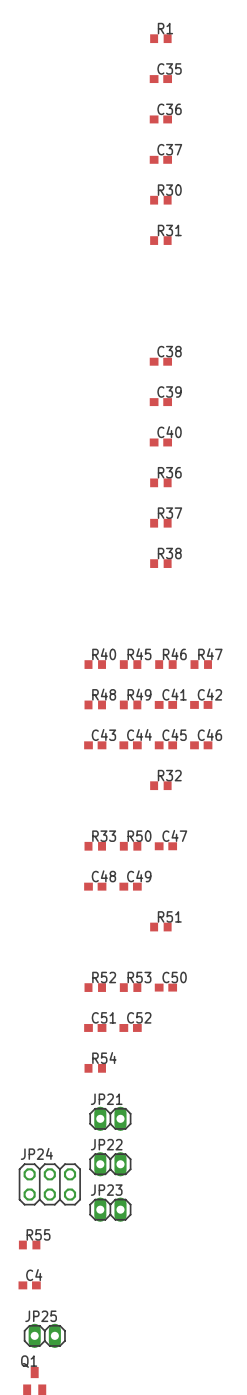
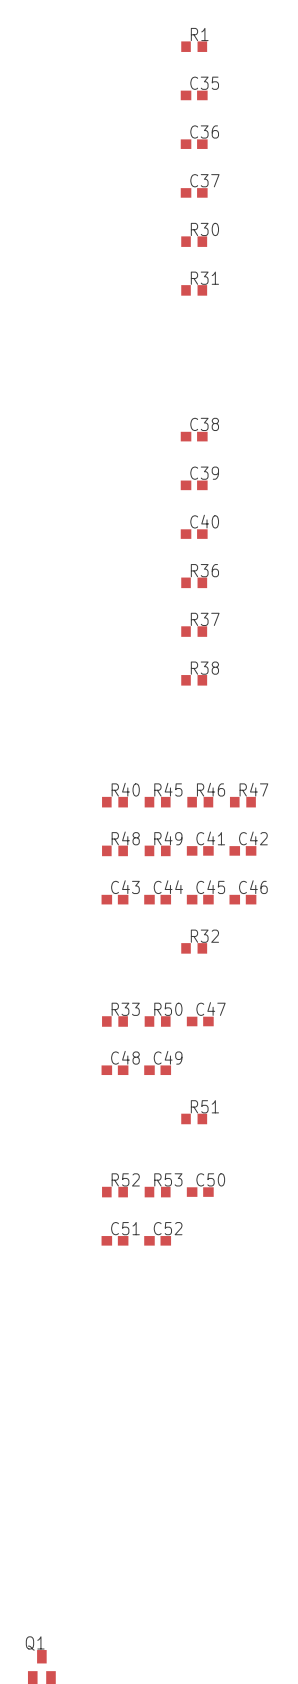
R54: (95, 1068) -> none
JP21: (110, 1118) -> none
JP22: (110, 1164) -> none
JP24: (49, 1184) -> none
JP23: (110, 1209) -> none
R55: (29, 1245) -> none
C4: (29, 1285) -> none
JP25: (44, 1335) -> none

